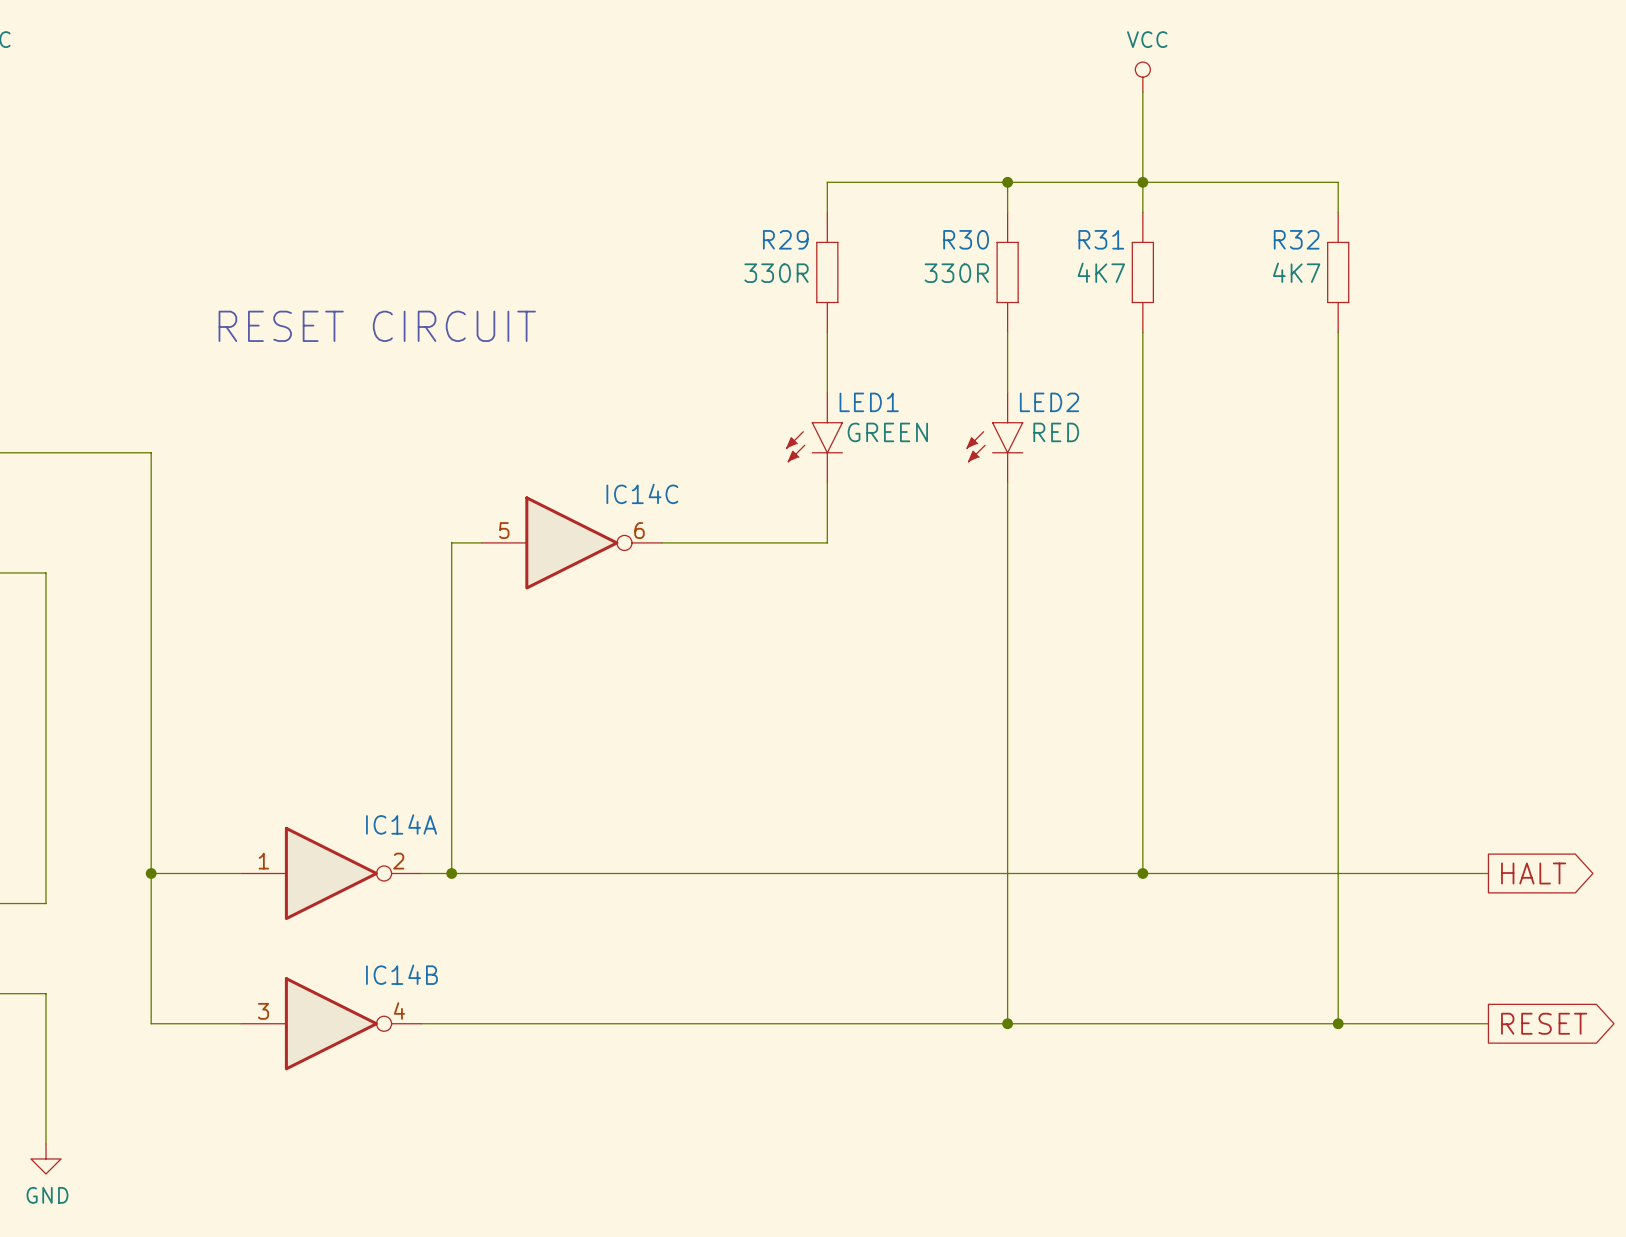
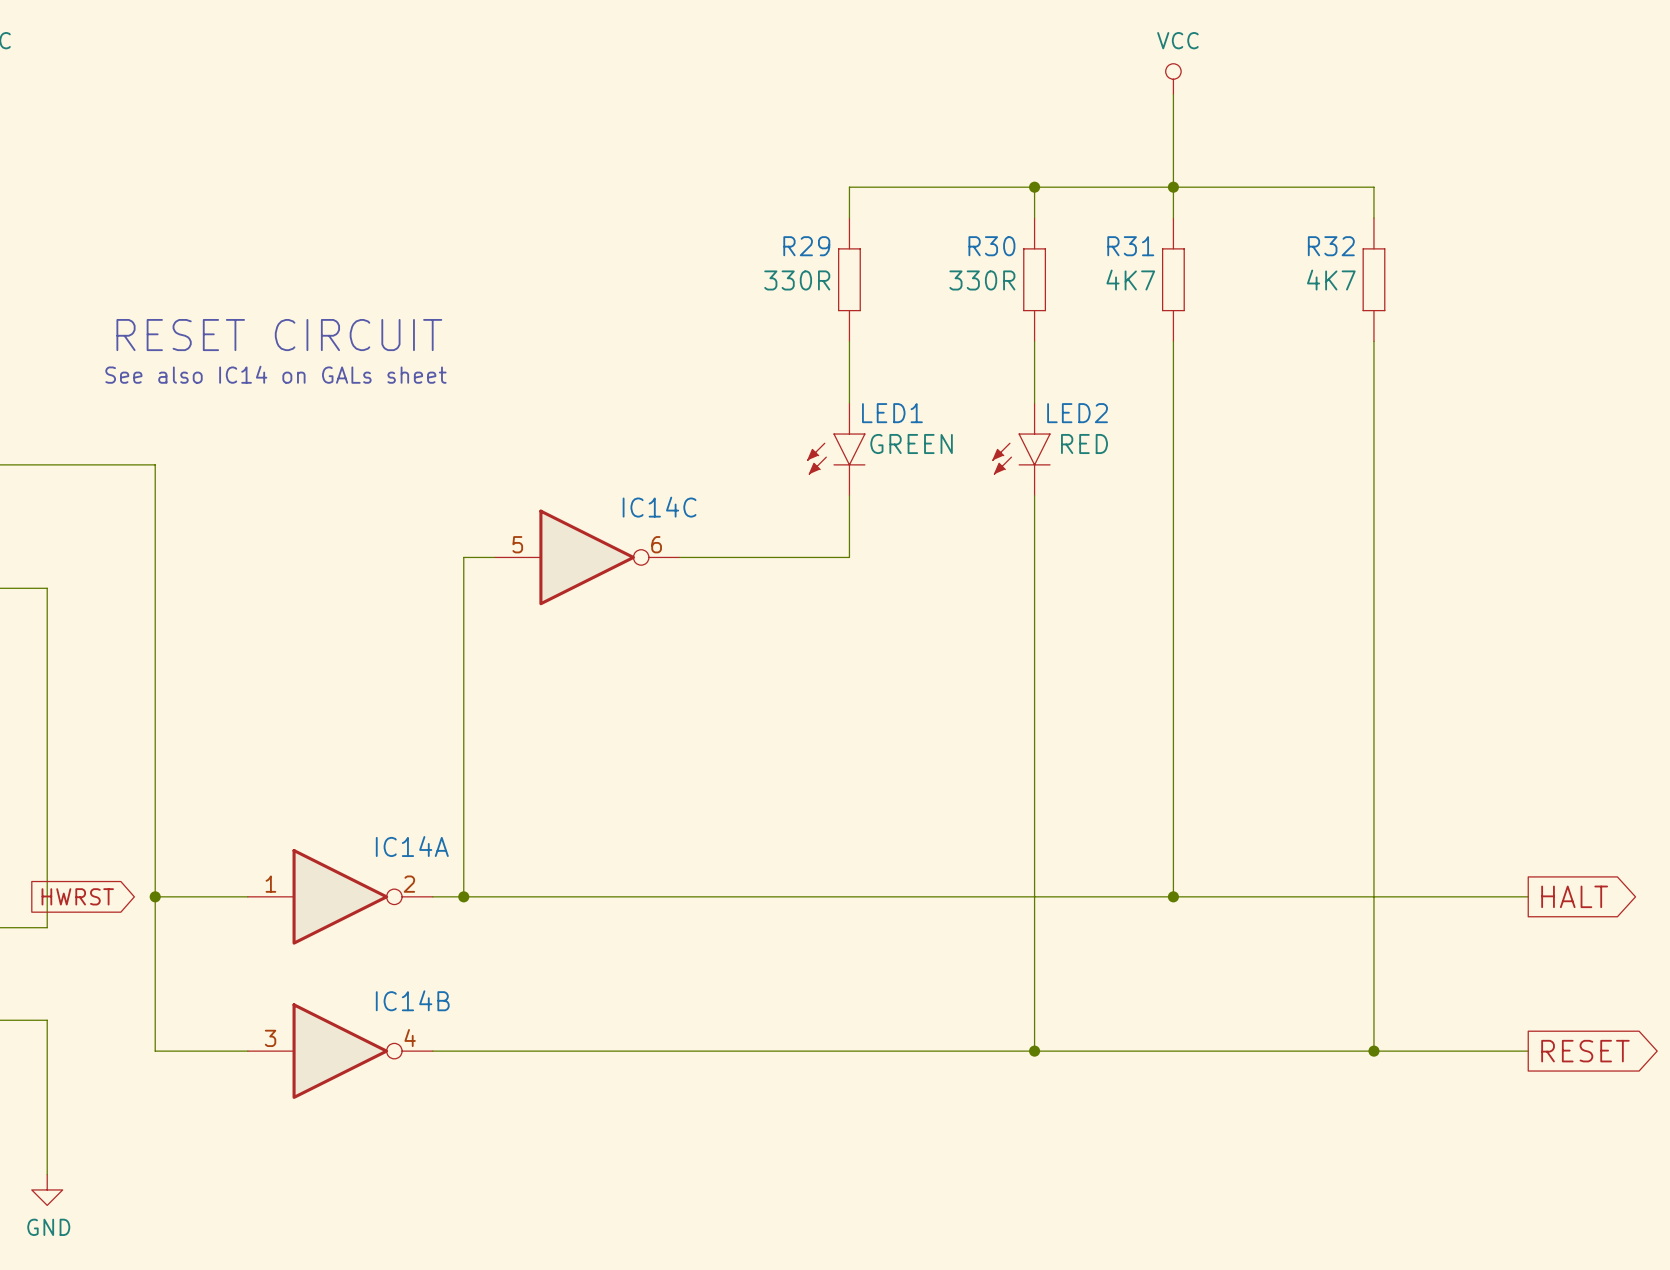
text position: RESET CIRCUIT (377, 326) -> RESET CIRCUIT (279, 335)
text: none -> See also IC14 on GALs sheet (275, 374)
global label: none -> HWRST (77, 896)

